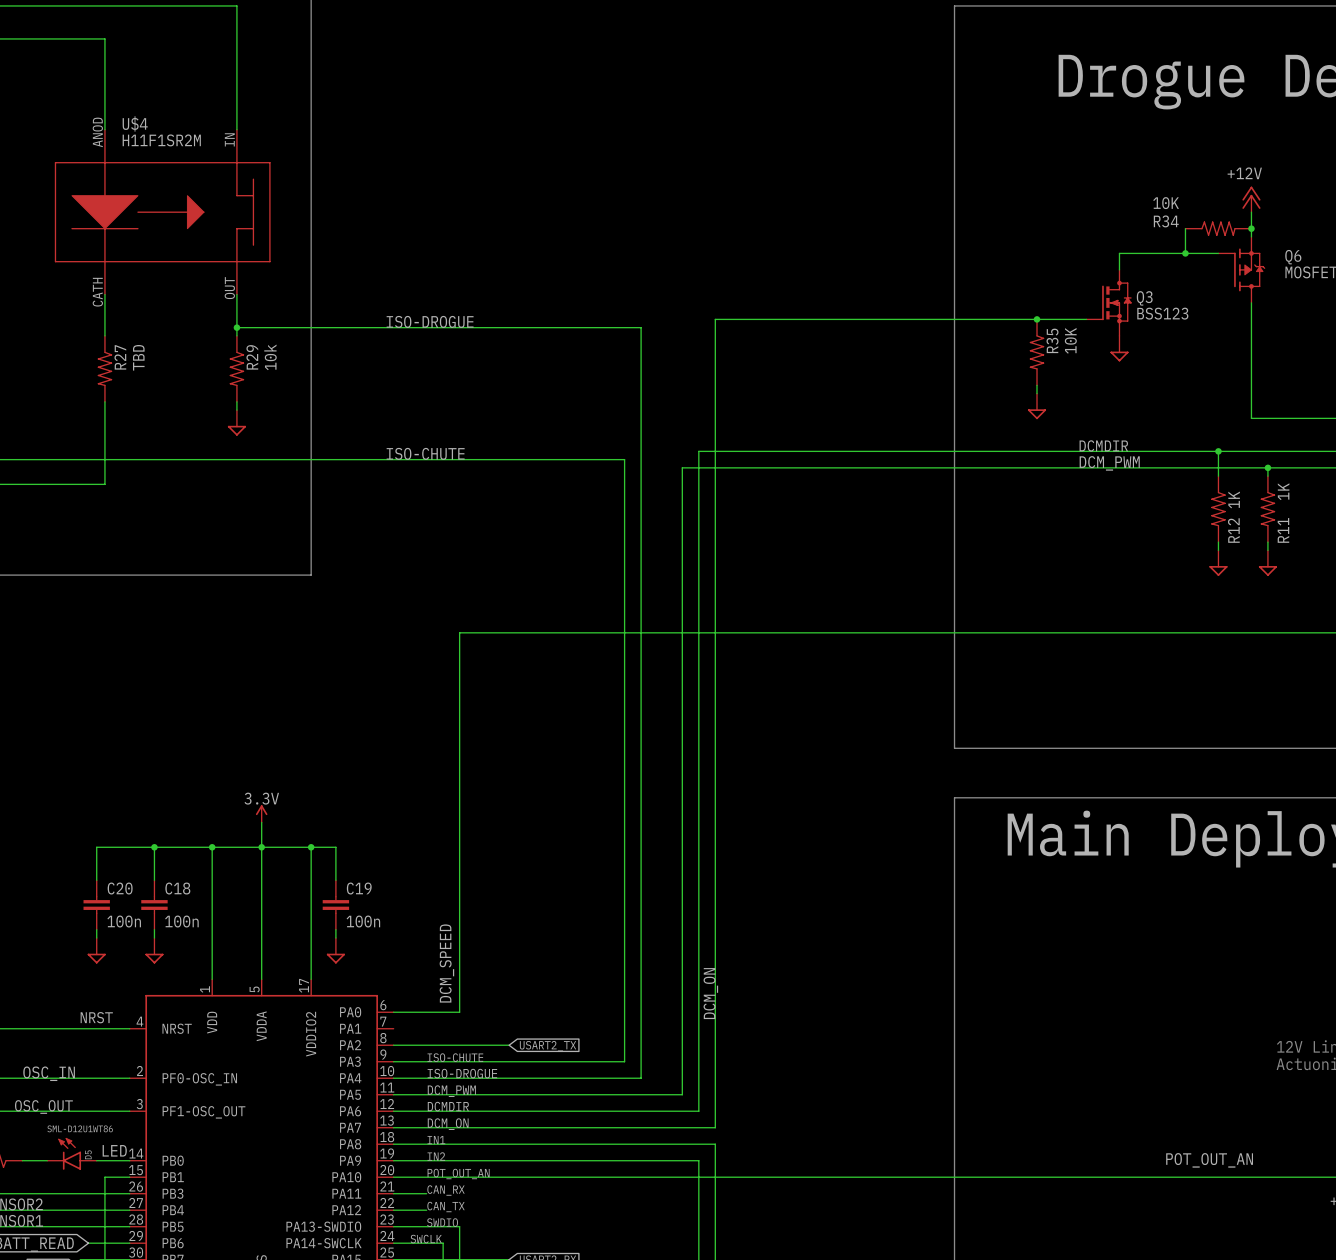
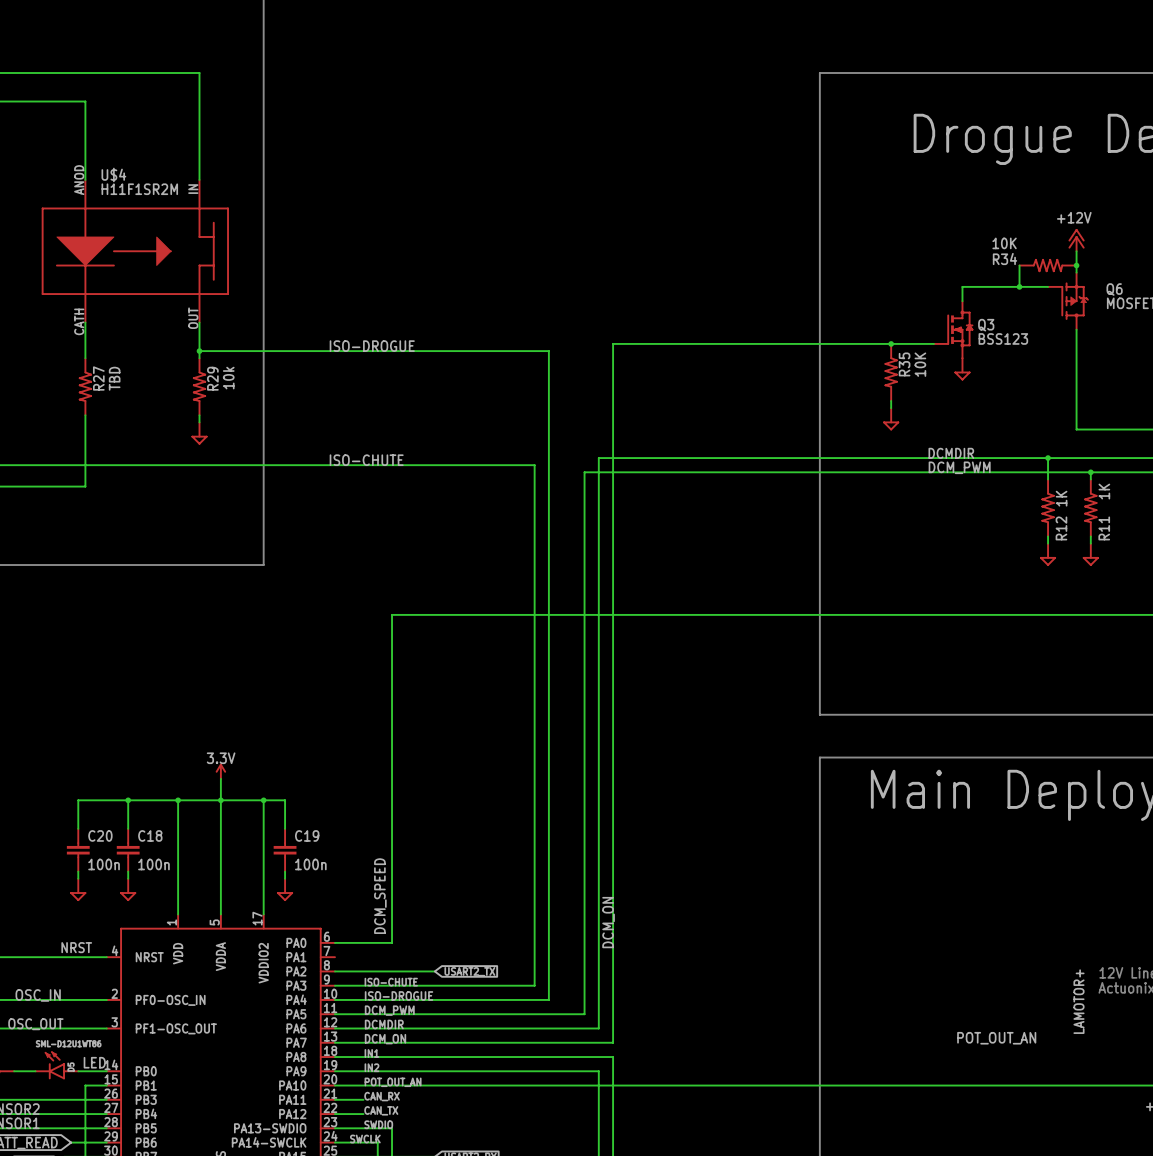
label: none -> LAMOTOR+ (1078, 1001)
label position: POT_OUT_AN (1209, 1160) -> POT_OUT_AN (996, 1038)

